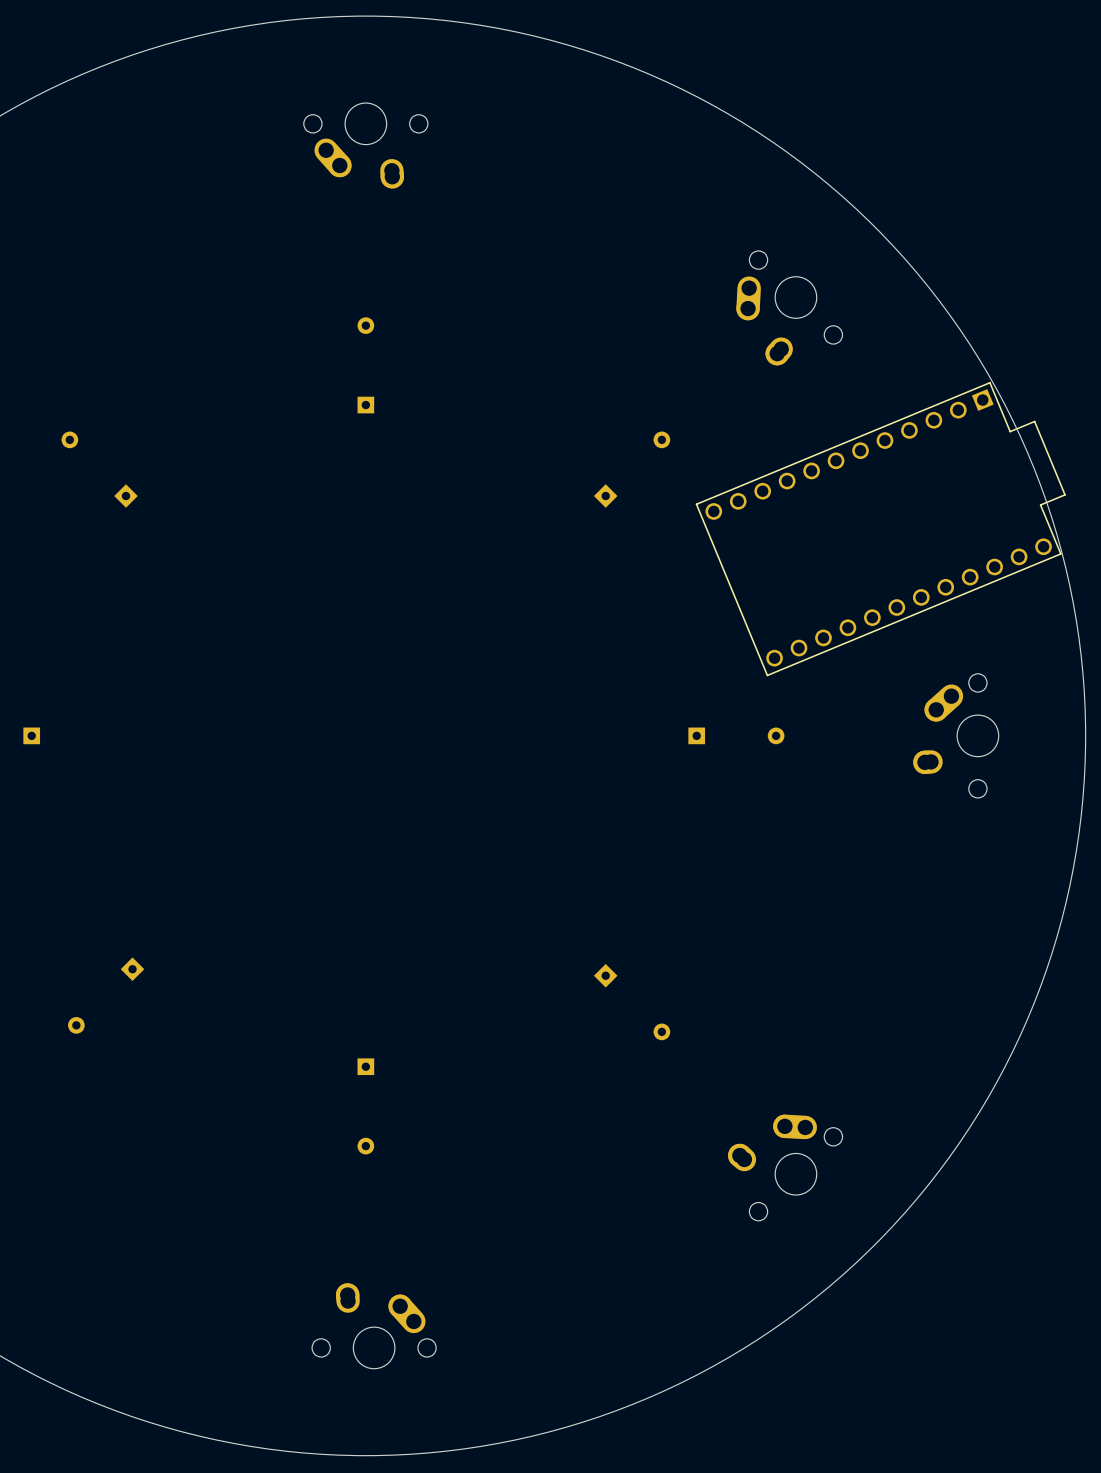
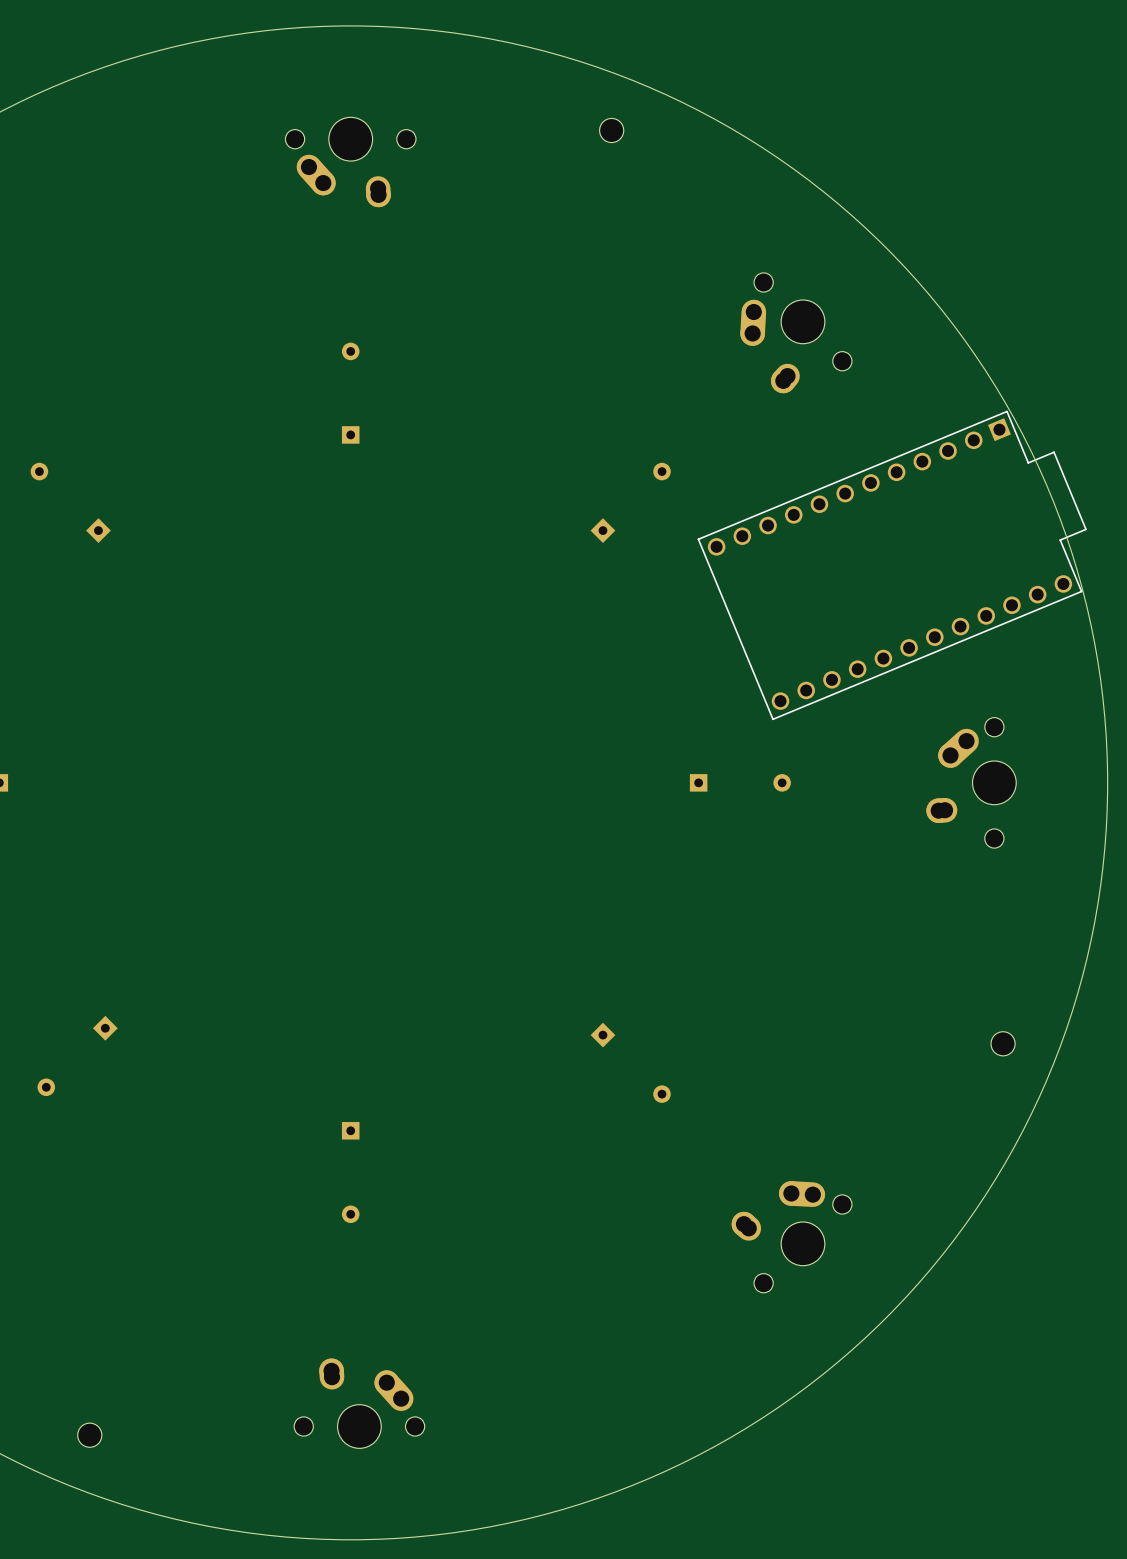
part: none -> (611, 130)
part: none -> (1003, 1043)
part: none -> (89, 1435)

